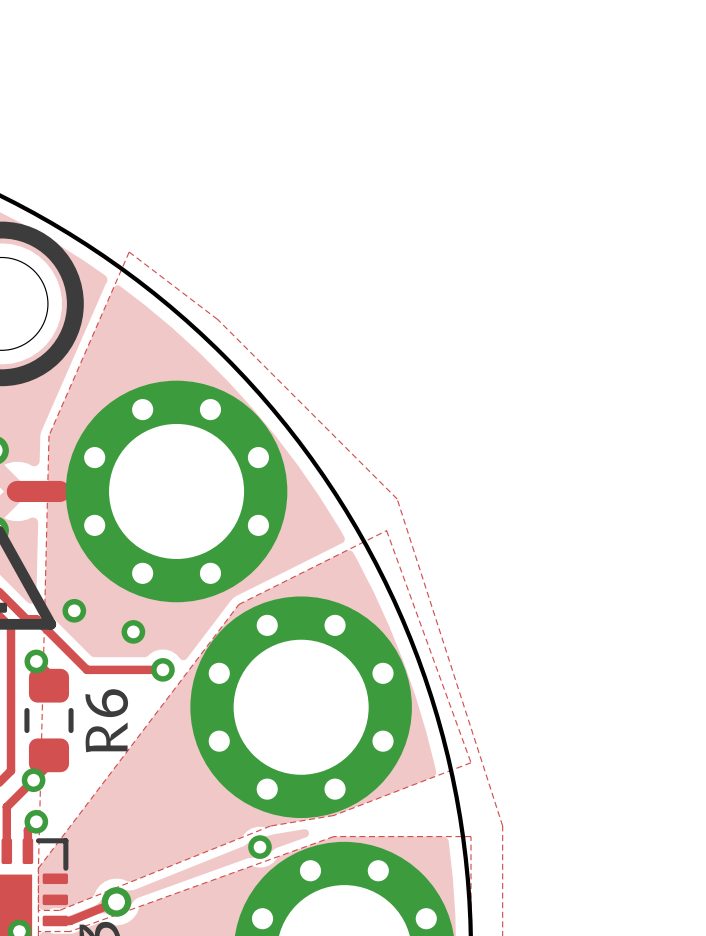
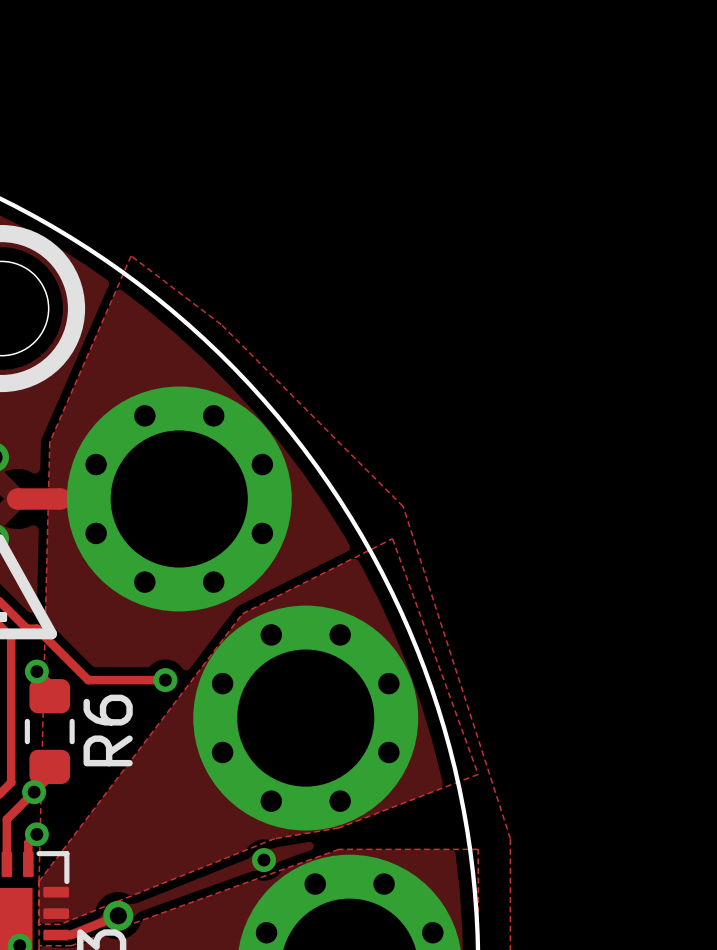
via: (74, 610) -> none
via: (133, 631) -> none

